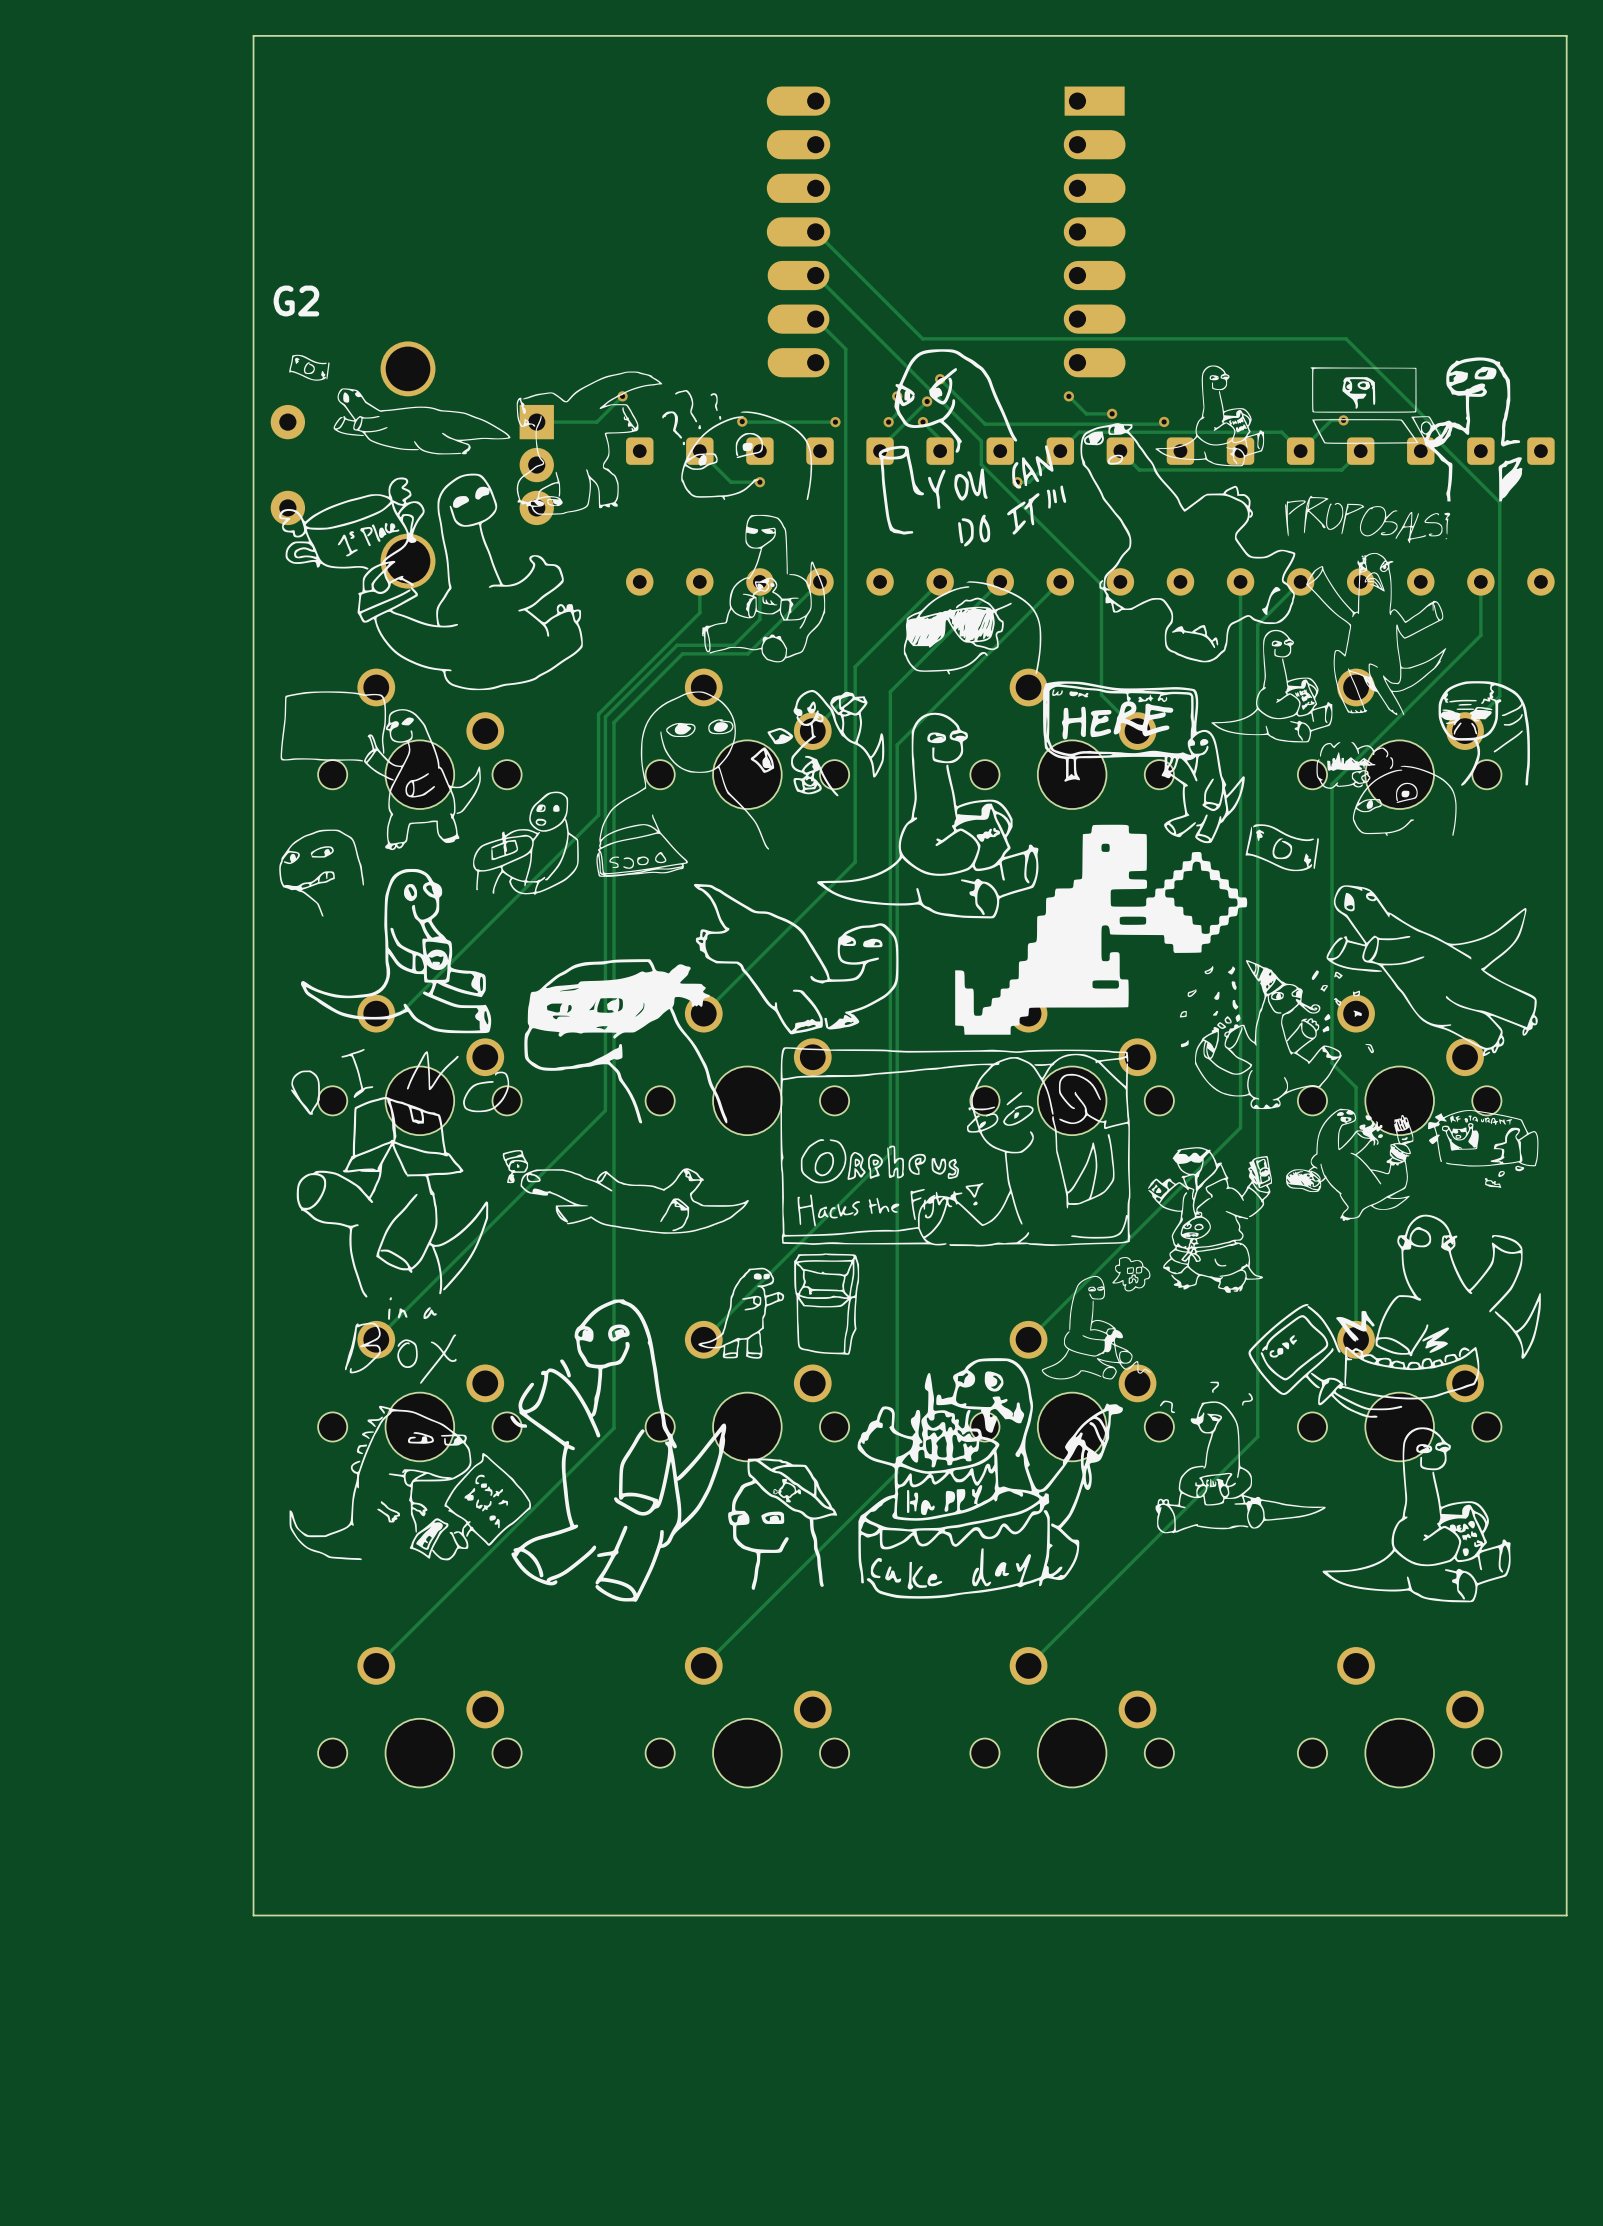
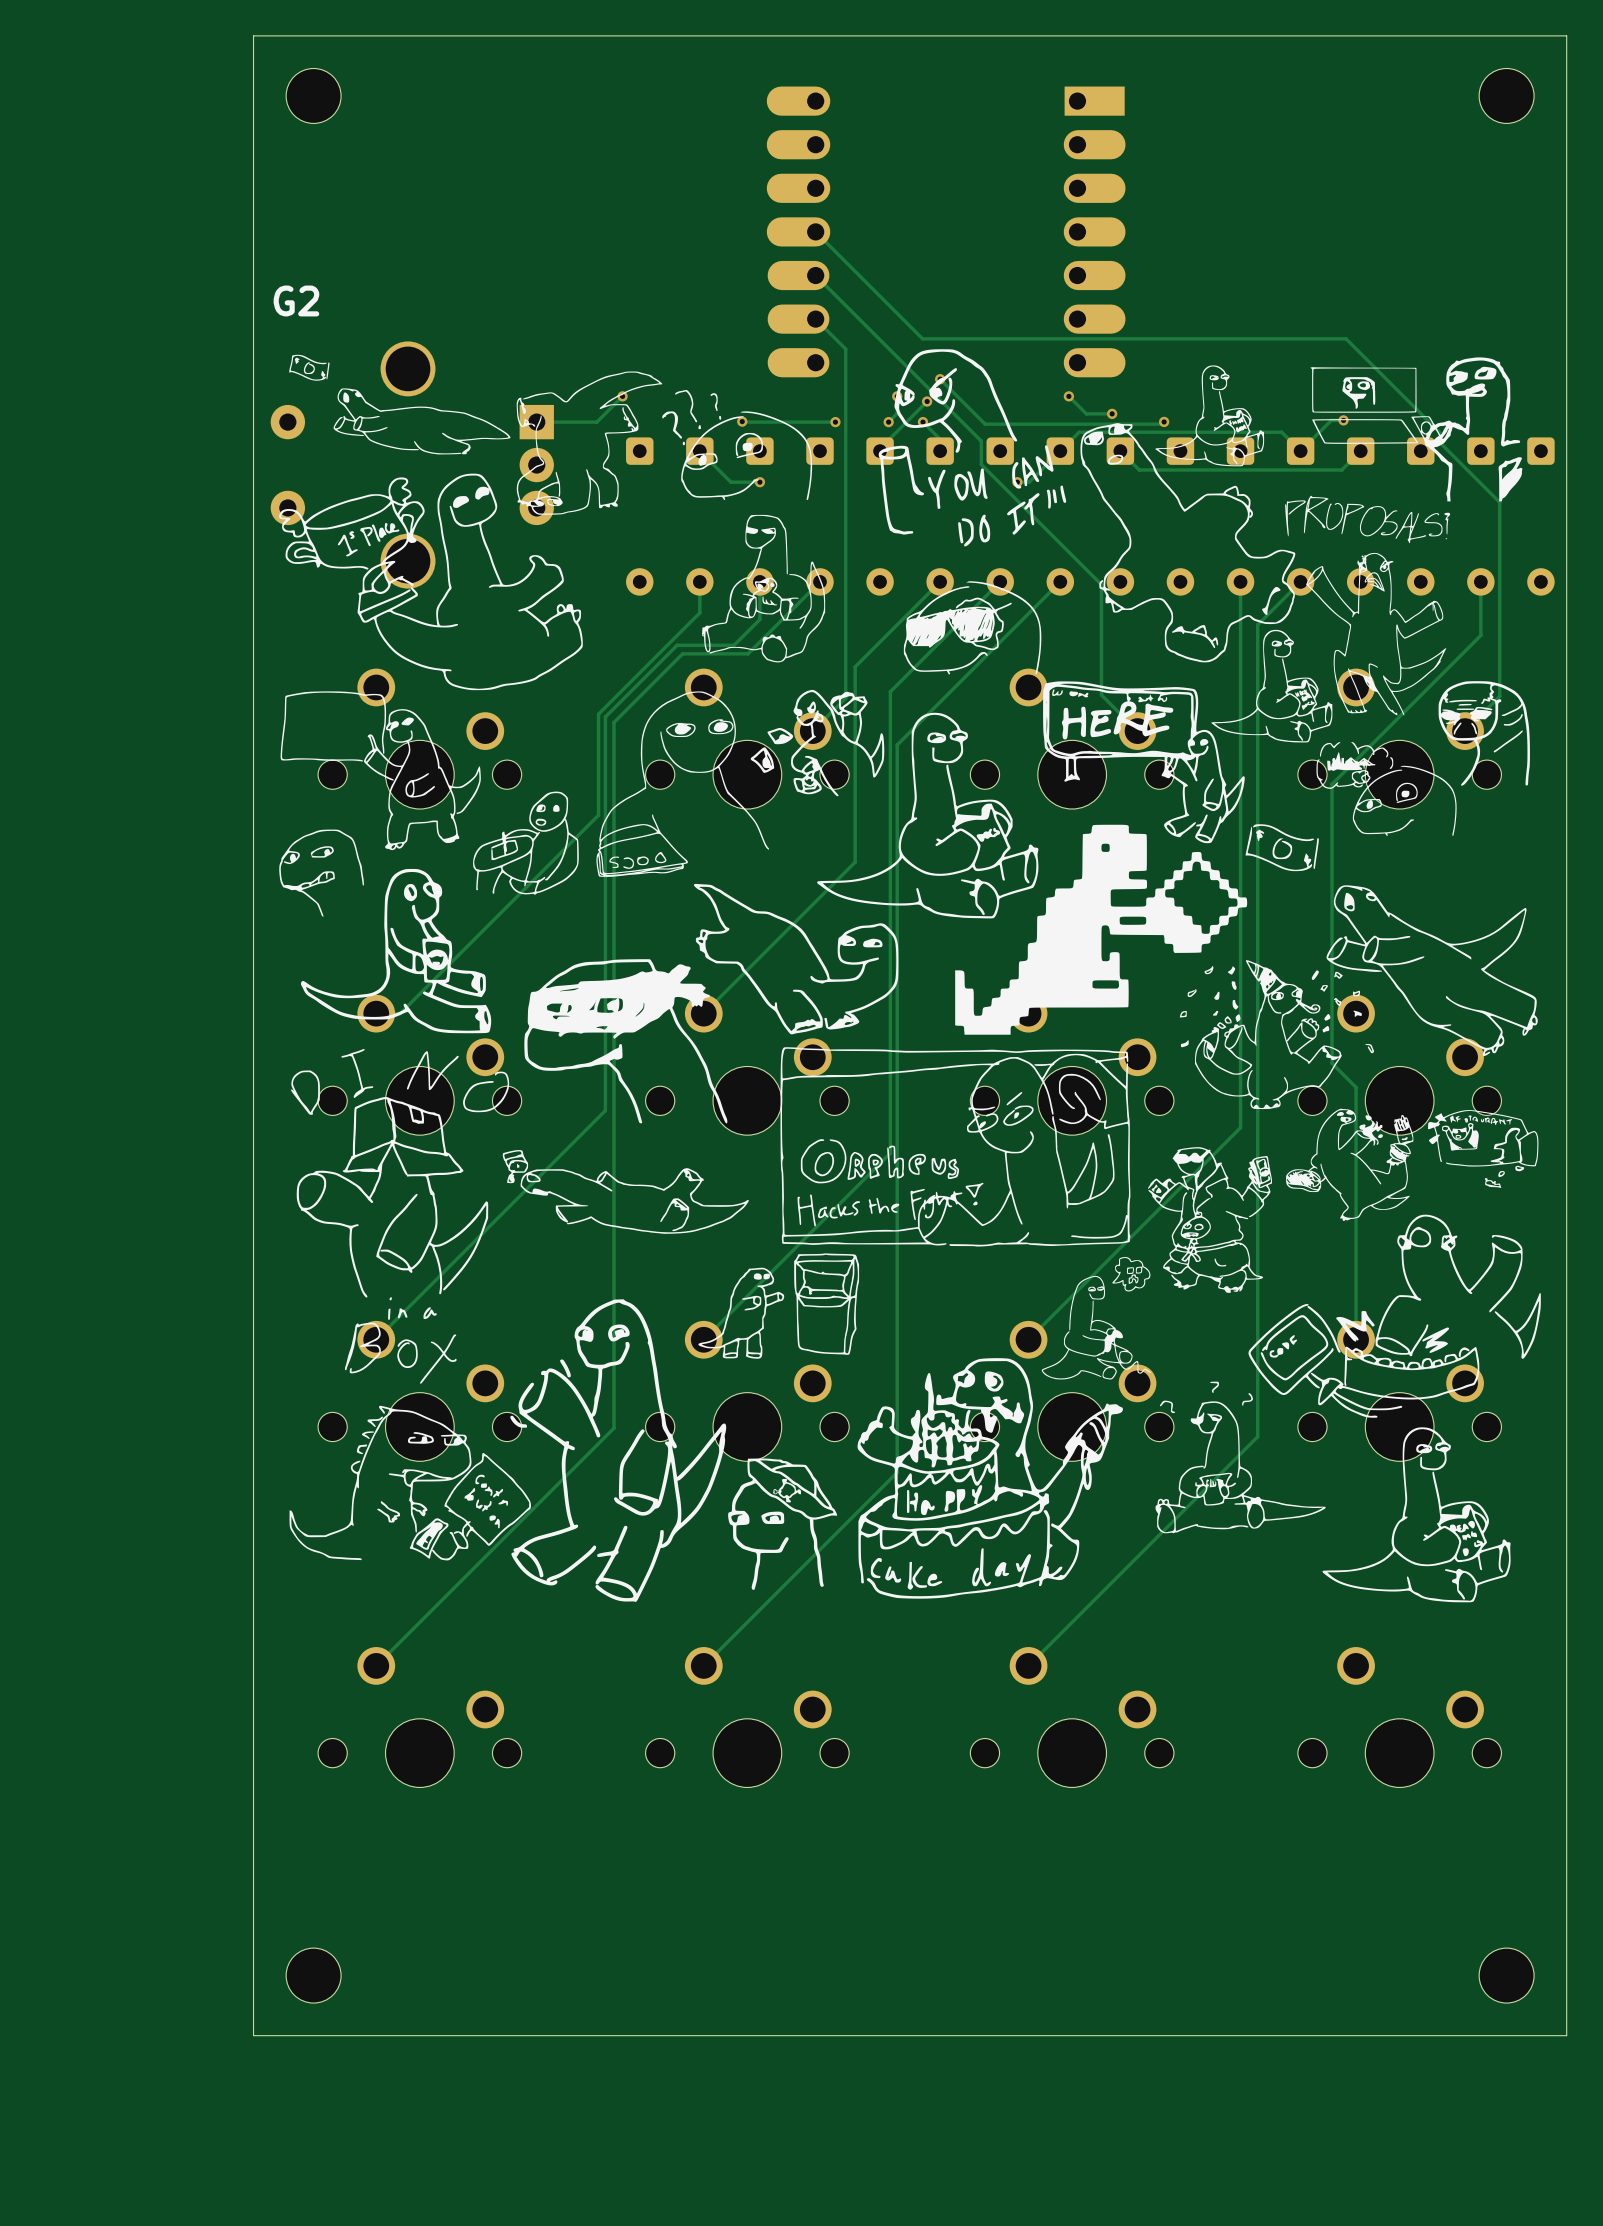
part: none -> (313, 95)
part: none -> (1506, 95)
board edge: (1566, 1915) (253, 1915) -> (1566, 1915) (1566, 2035) (253, 2035) (253, 1915)
part: none -> (313, 1975)
part: none -> (1506, 1975)

